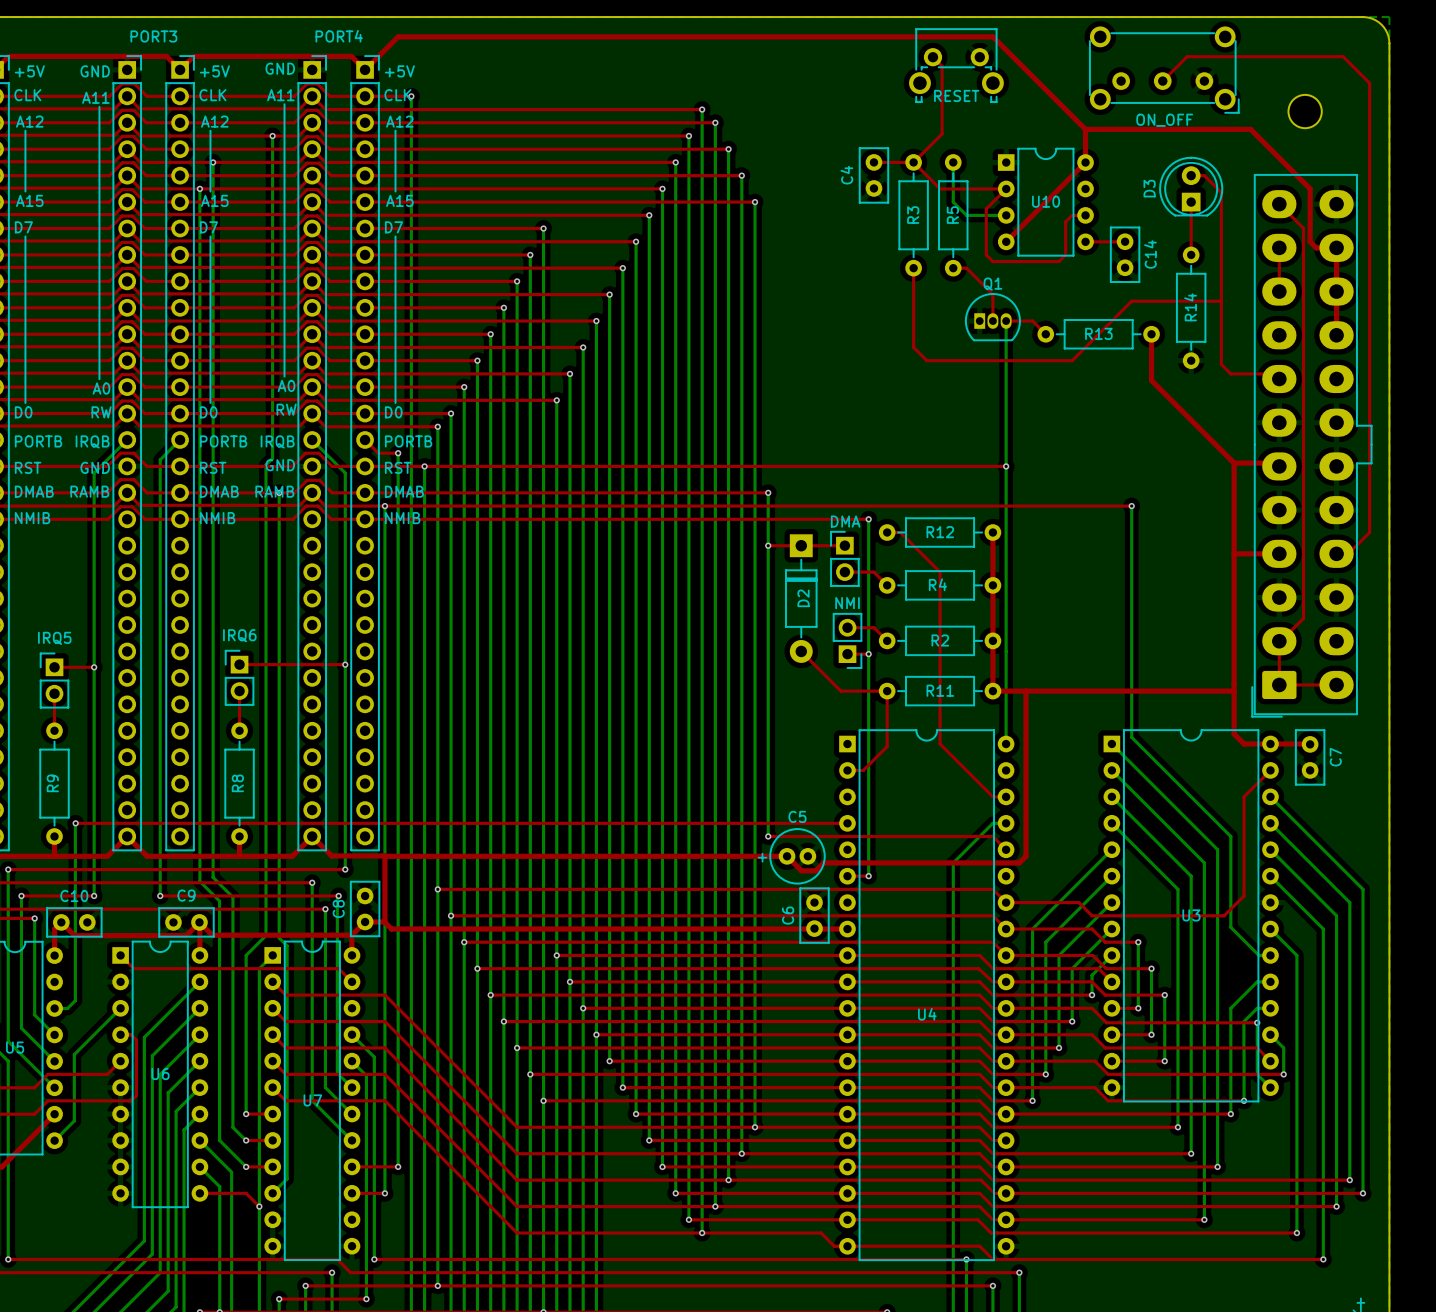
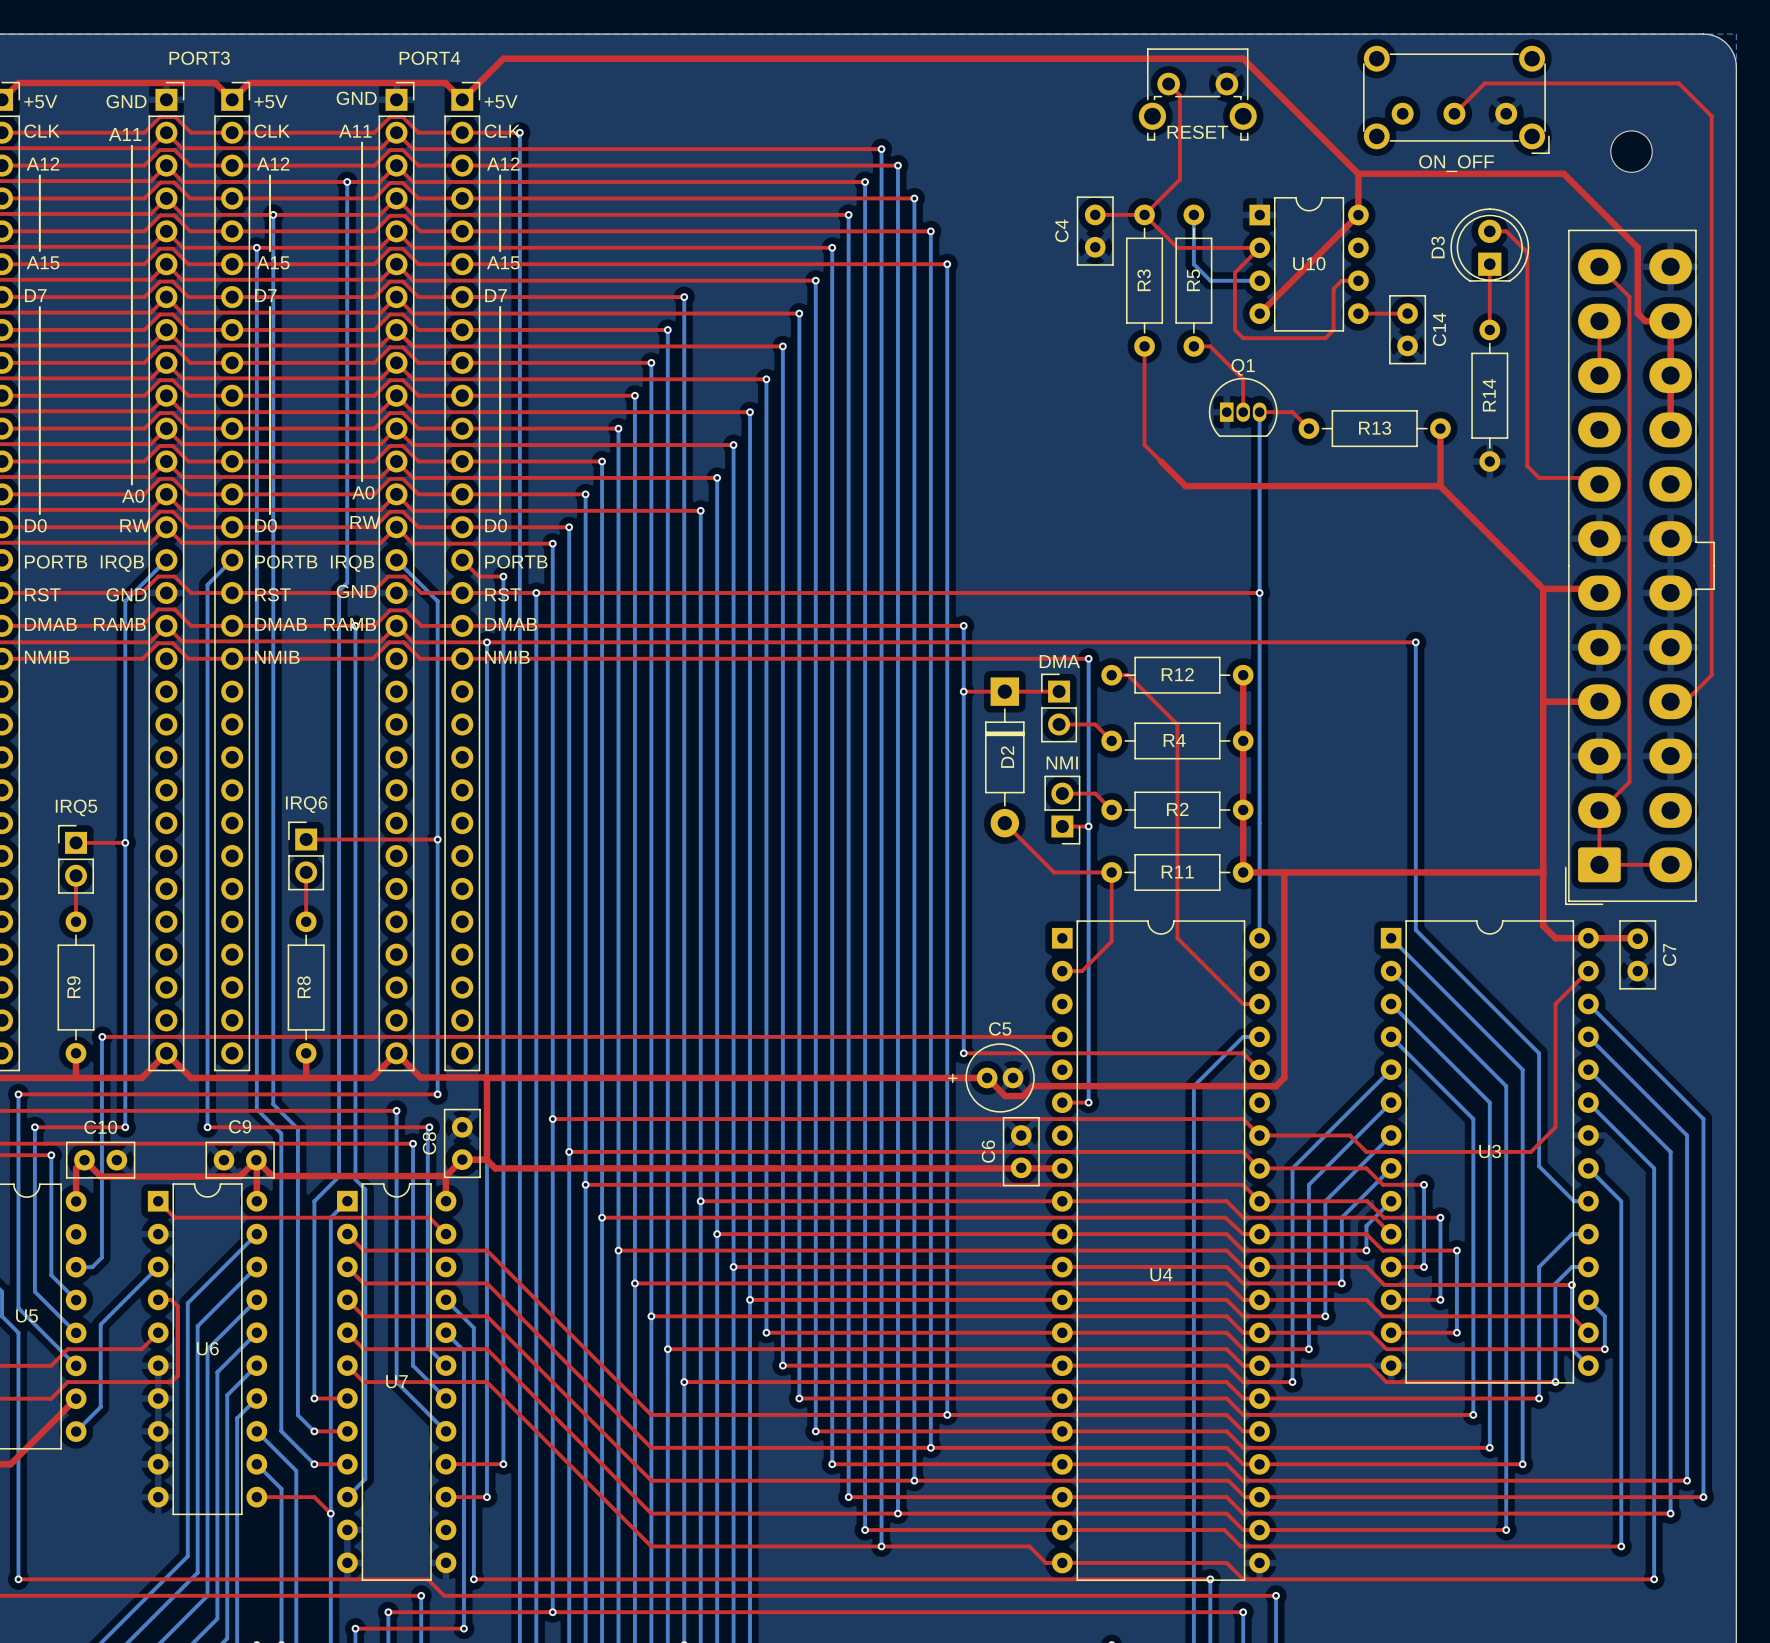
top track: (1221, 301) (1131, 301) (1072, 360) (926, 360) -> (1440, 486) (1185, 486) (1161, 461)

